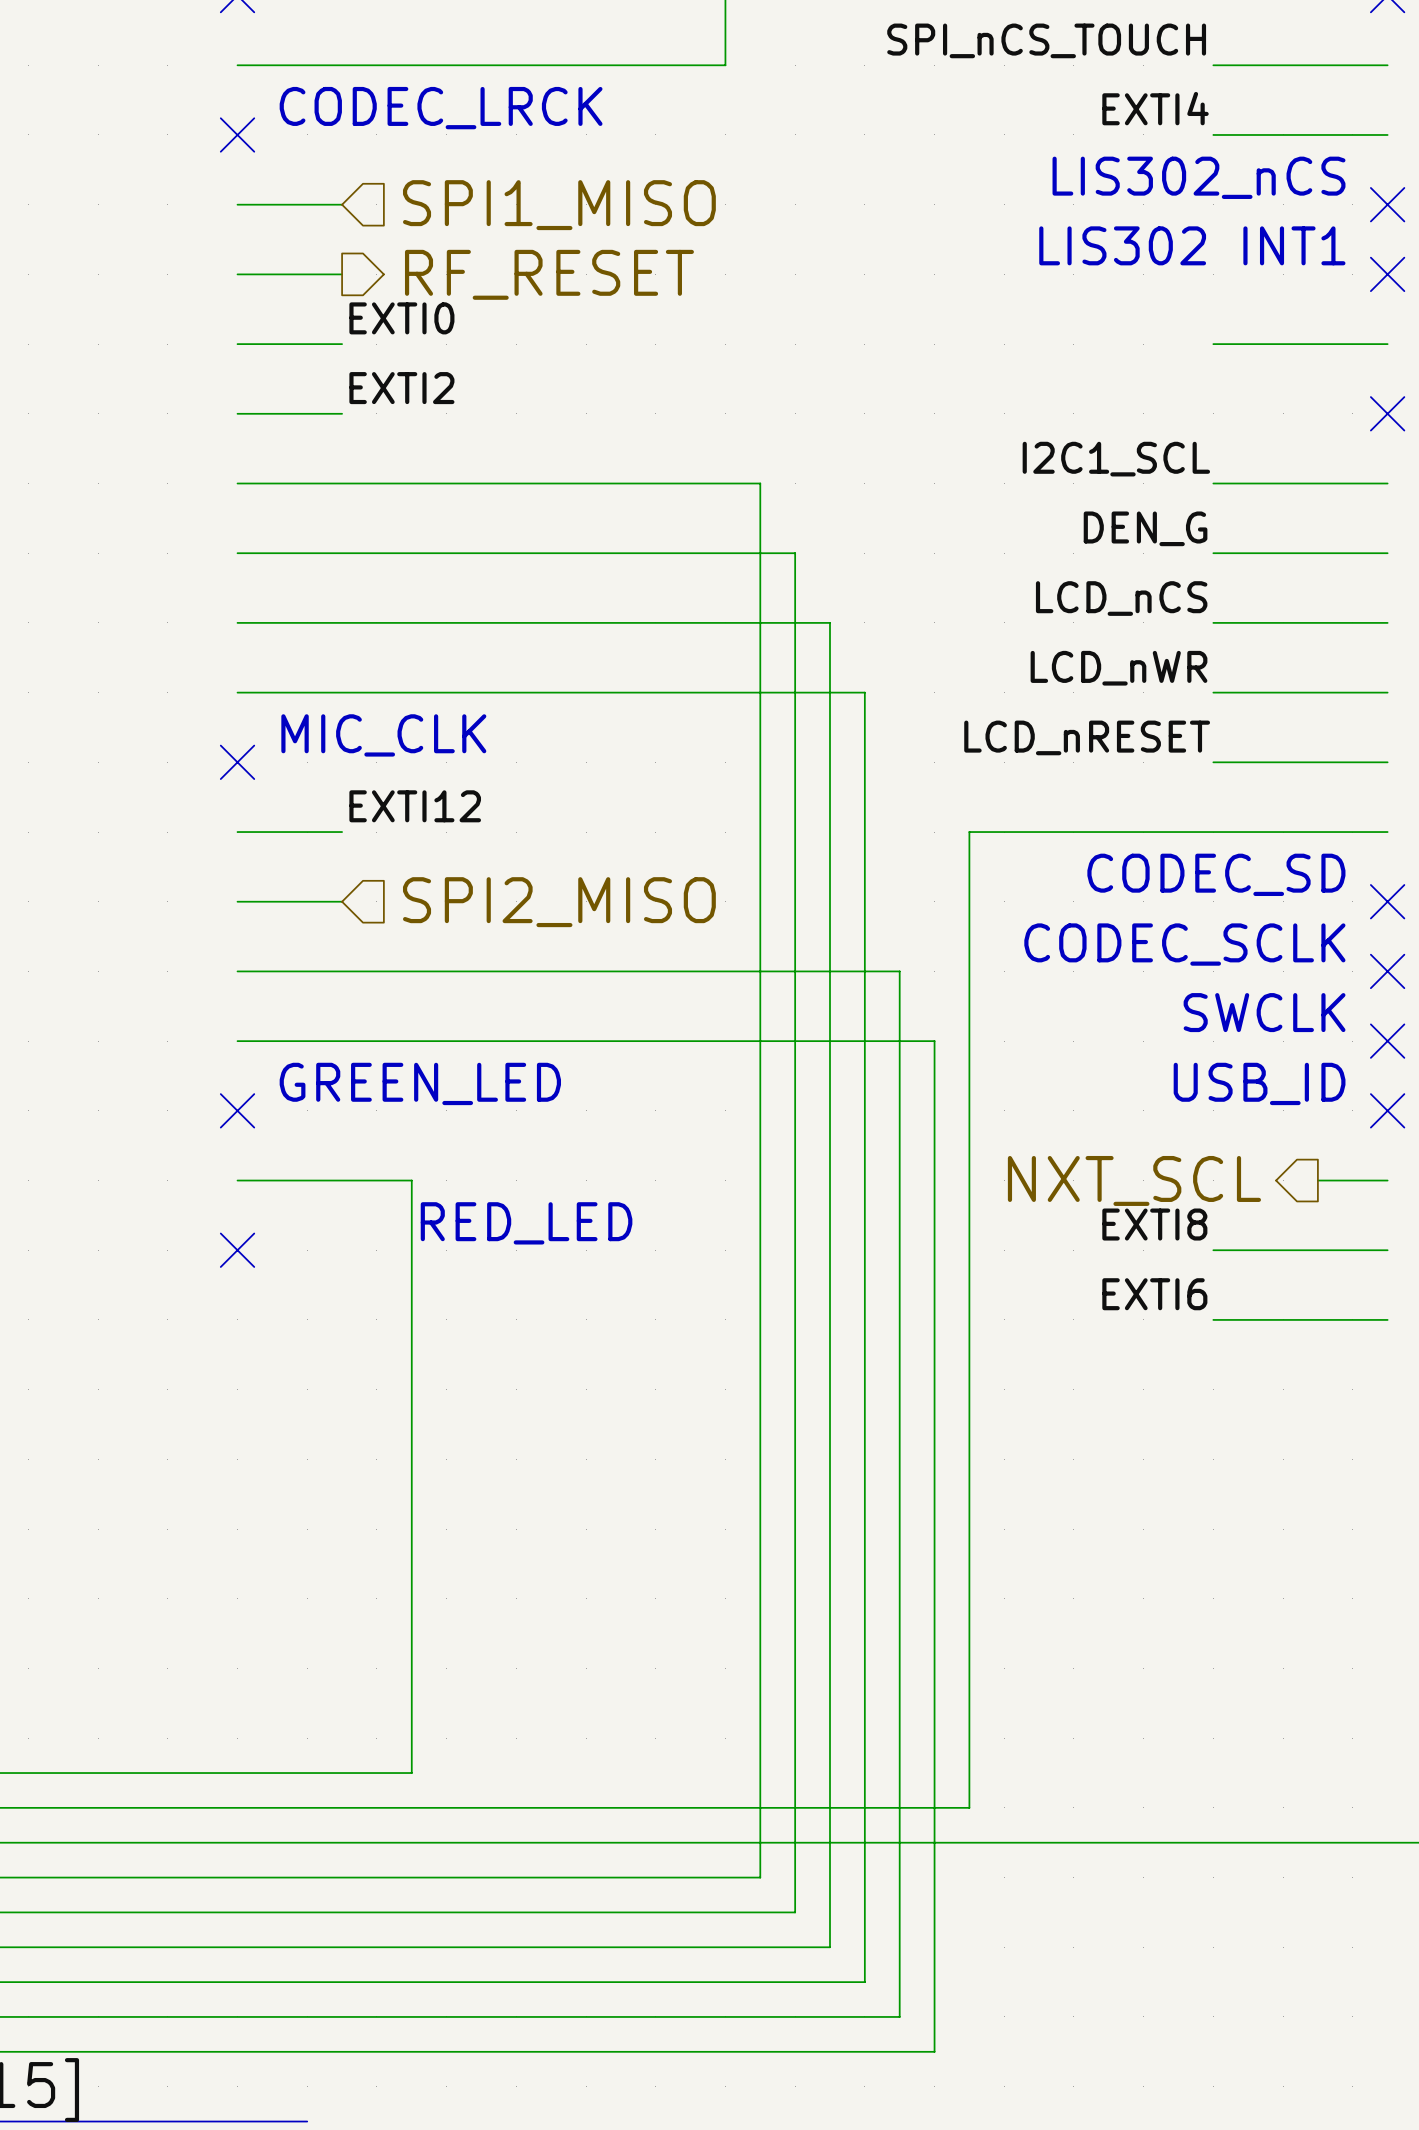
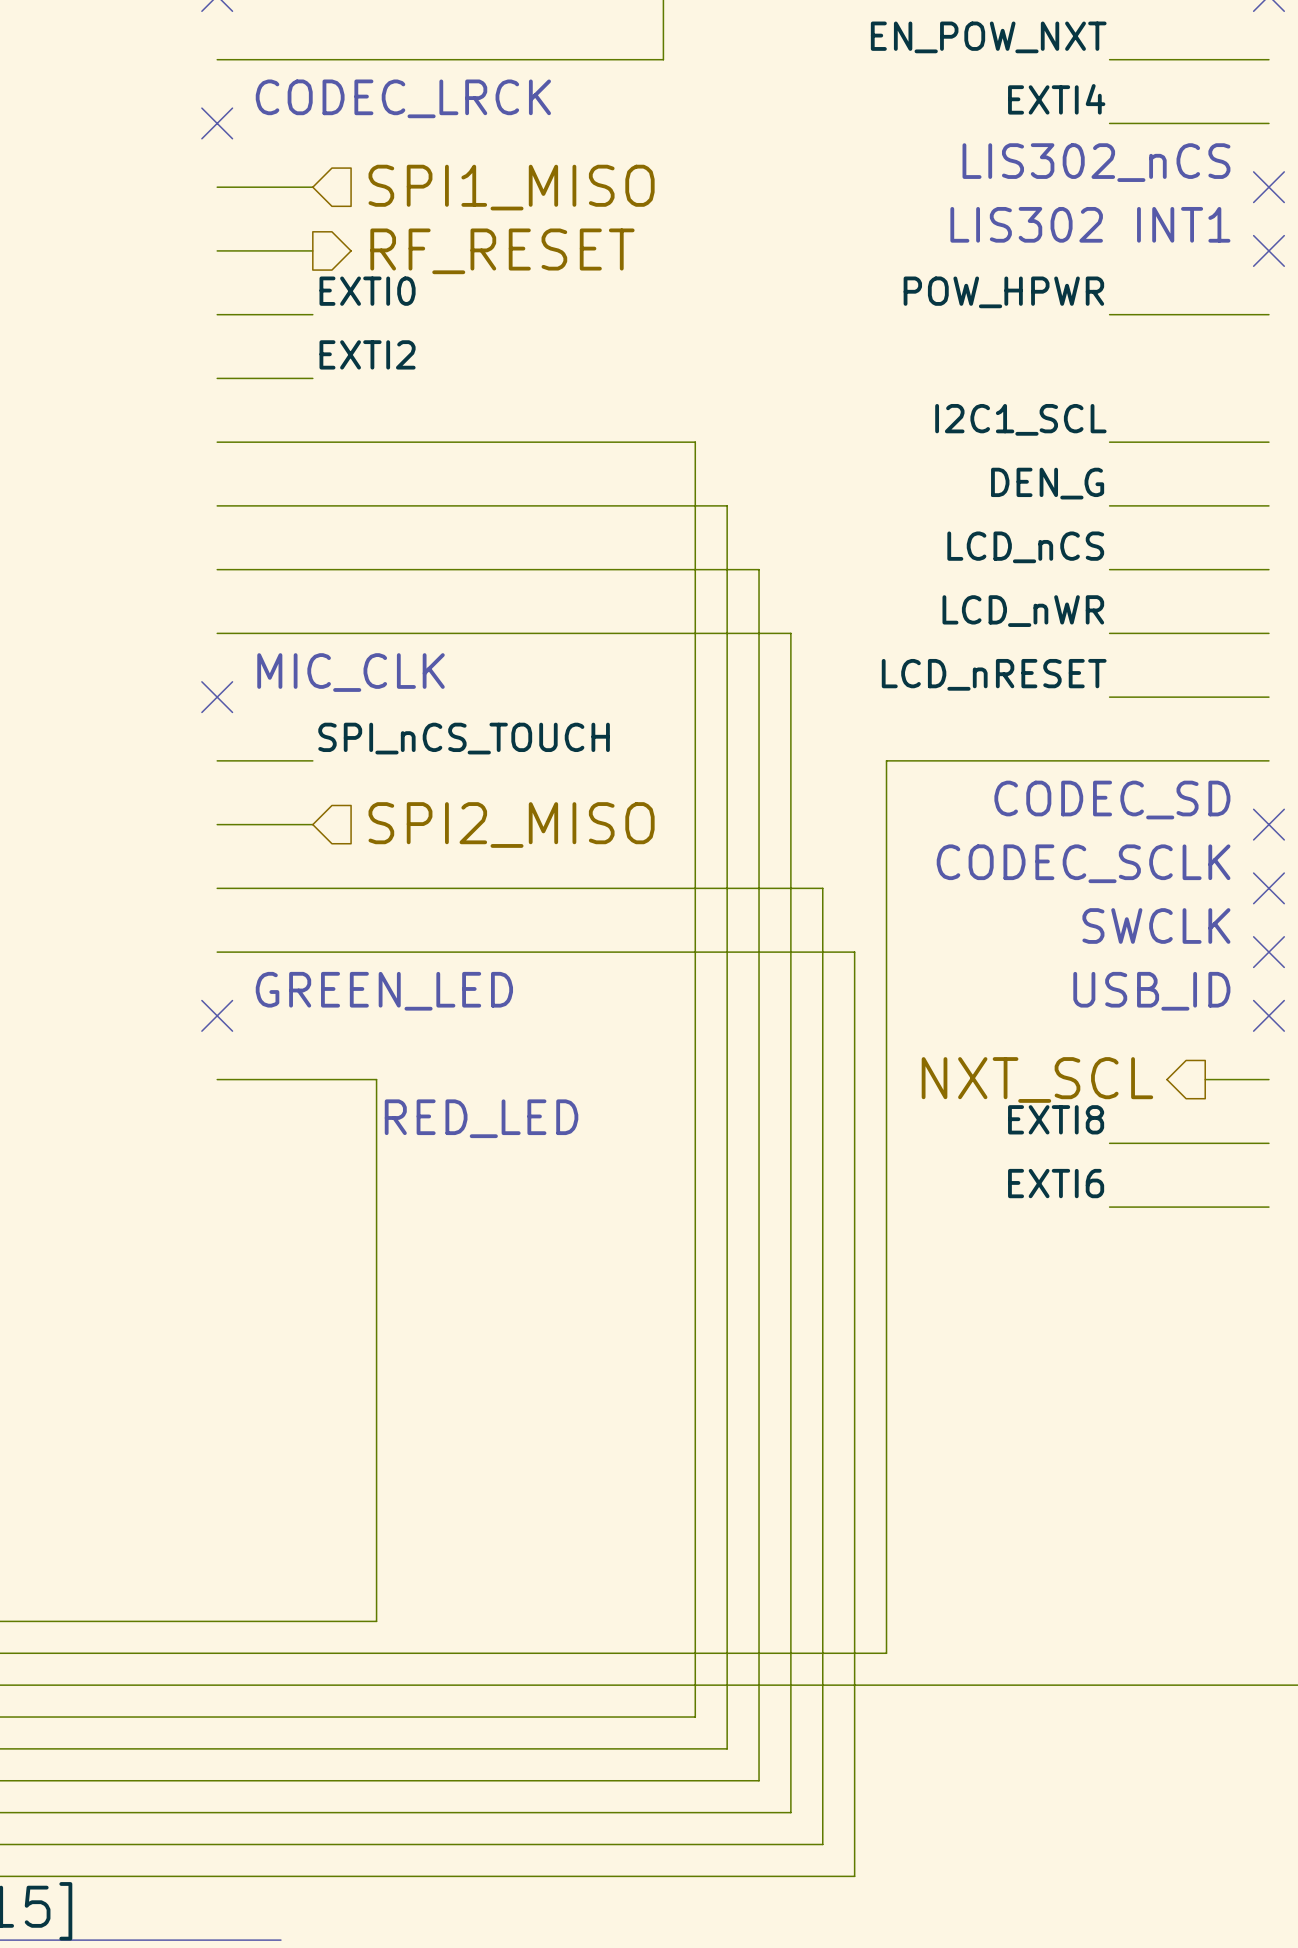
label: SPI_nCS_TOUCH (1046, 40) -> EN_POW_NXT (988, 37)
label: none -> POW_HPWR (1003, 292)
no-connect mark: (1387, 413) -> none
label: EXTI12 (415, 806) -> SPI_nCS_TOUCH (464, 738)
no-connect mark: (237, 1250) -> none

